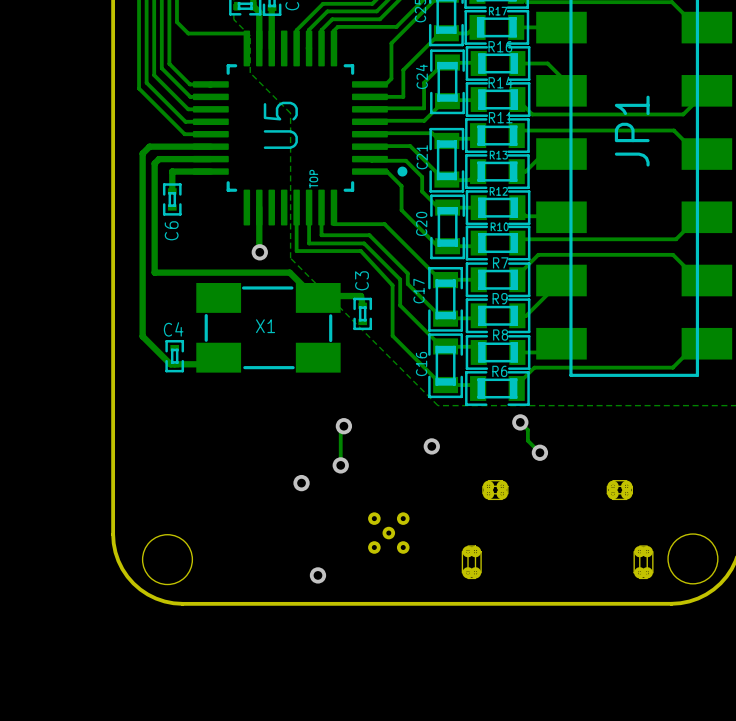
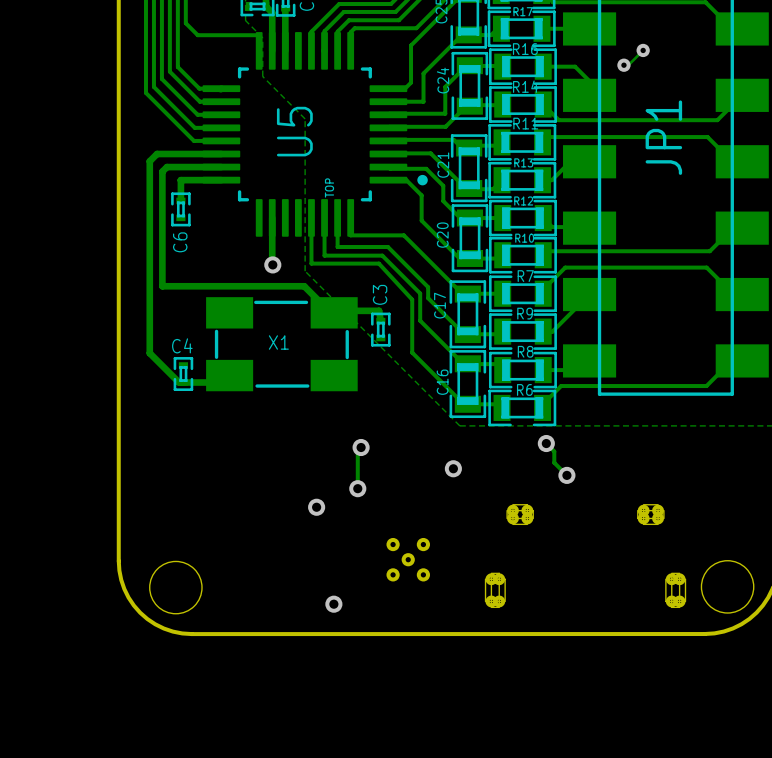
track: none -> (643, 50) (628, 65) (624, 65)
via: none -> (643, 50)
via: none -> (623, 65)

